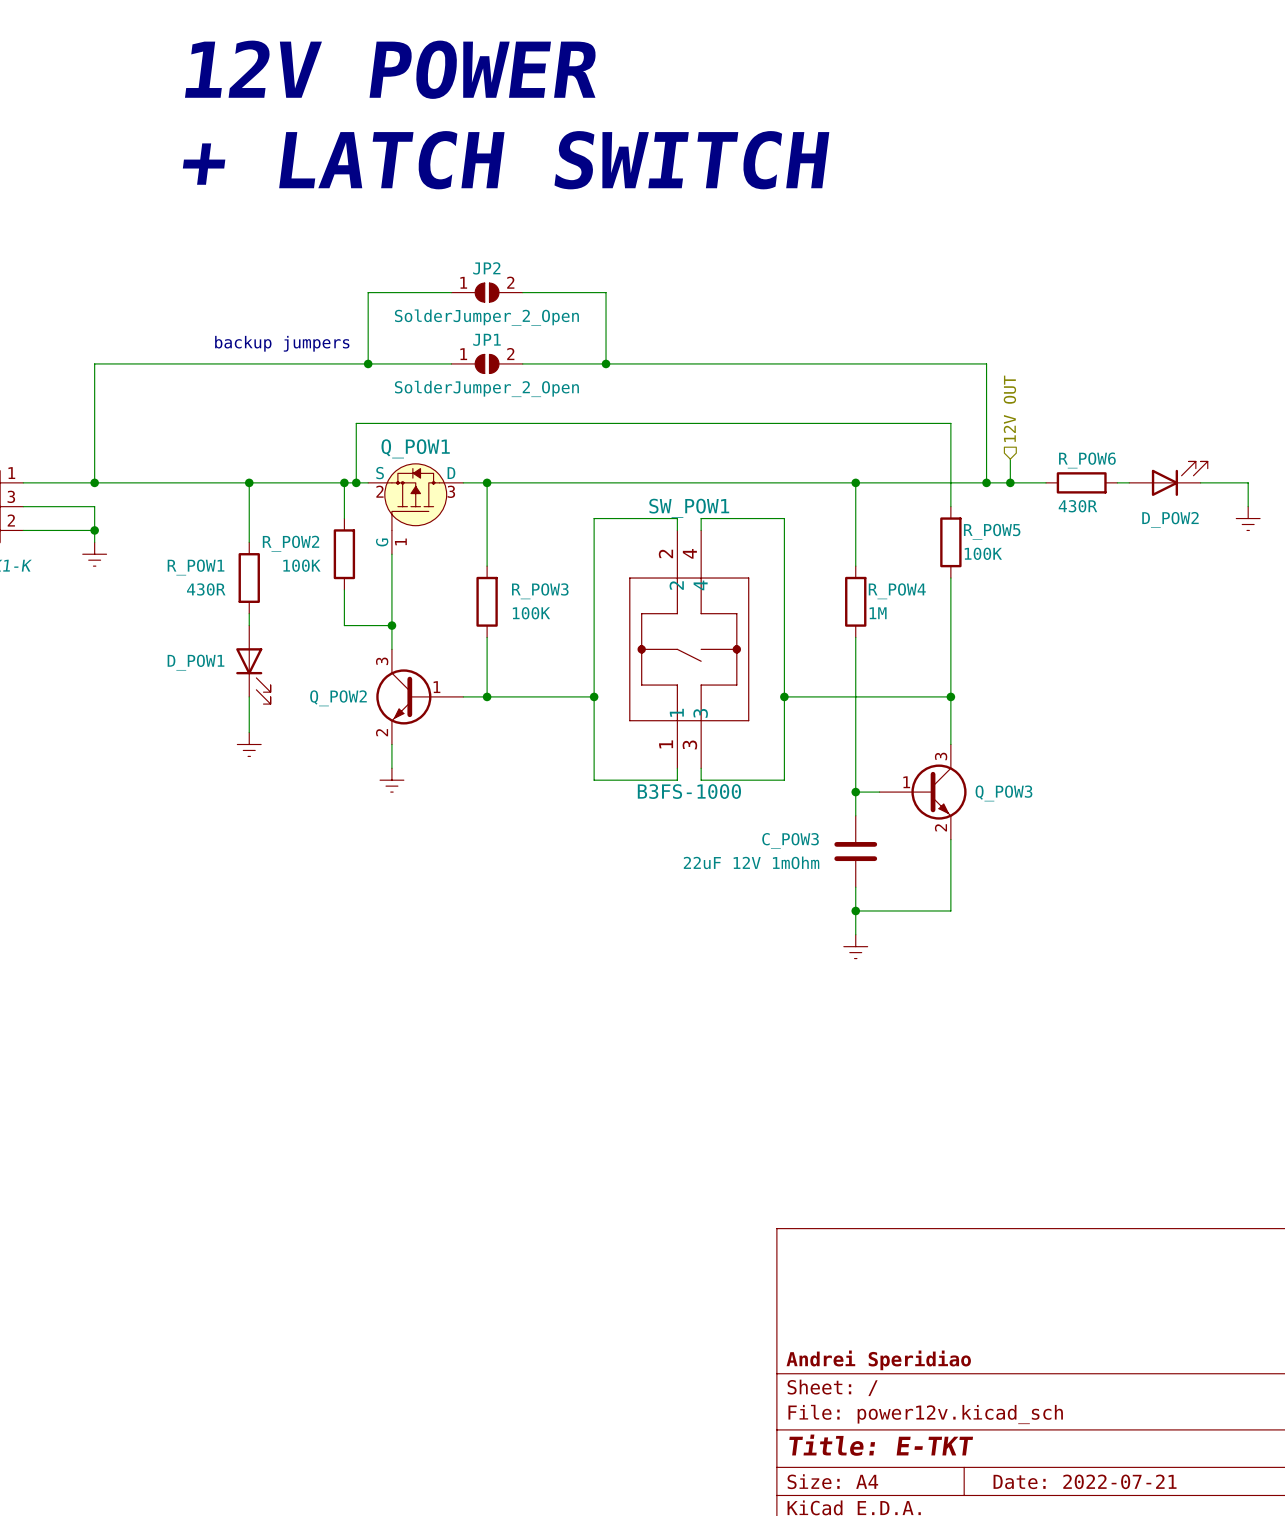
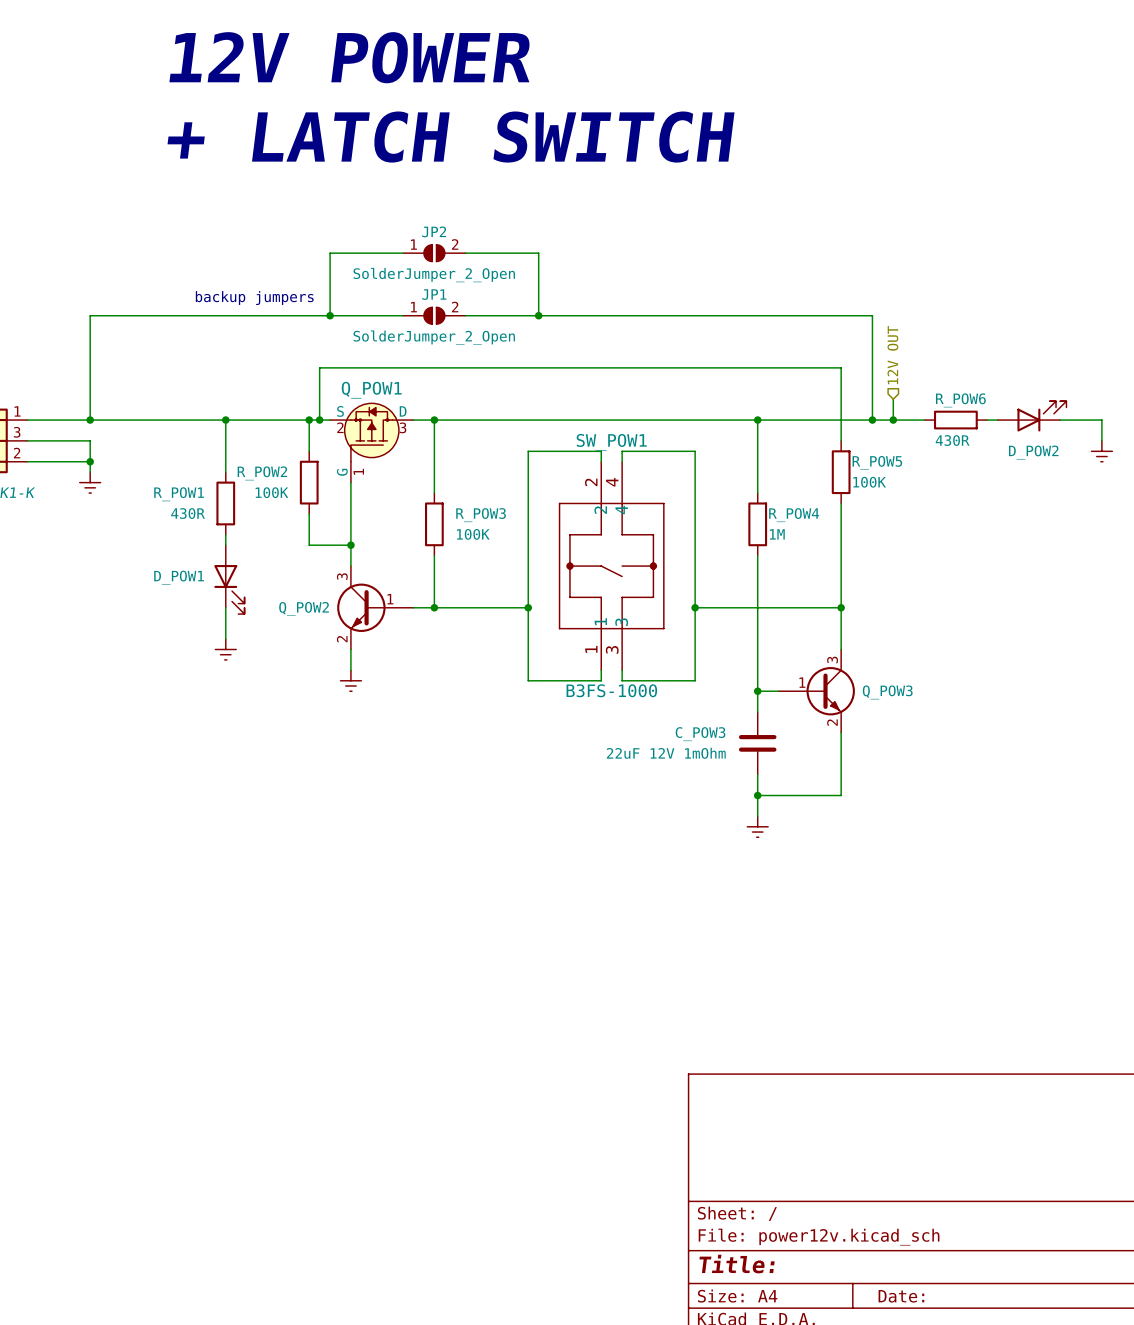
title block: Andrei Speridiao (878, 1360) -> none
title block: Title: E-TKT (881, 1445) -> Title: (737, 1264)
title block: Date: 2022-07-21 (1085, 1481) -> Date: (901, 1296)

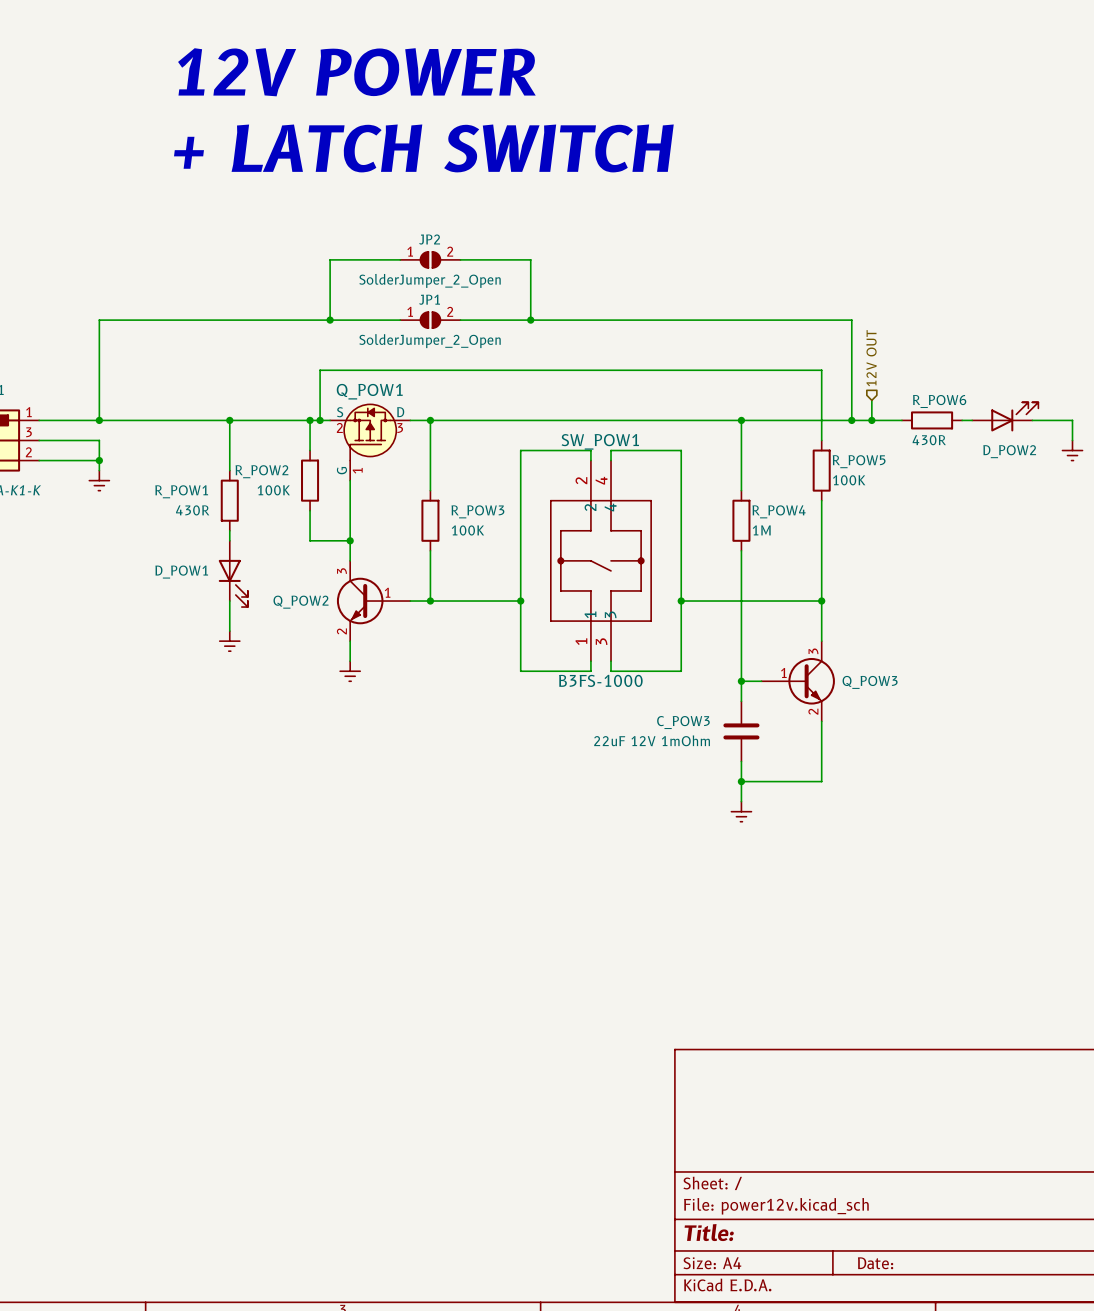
text: backup jumpers (254, 298) -> none

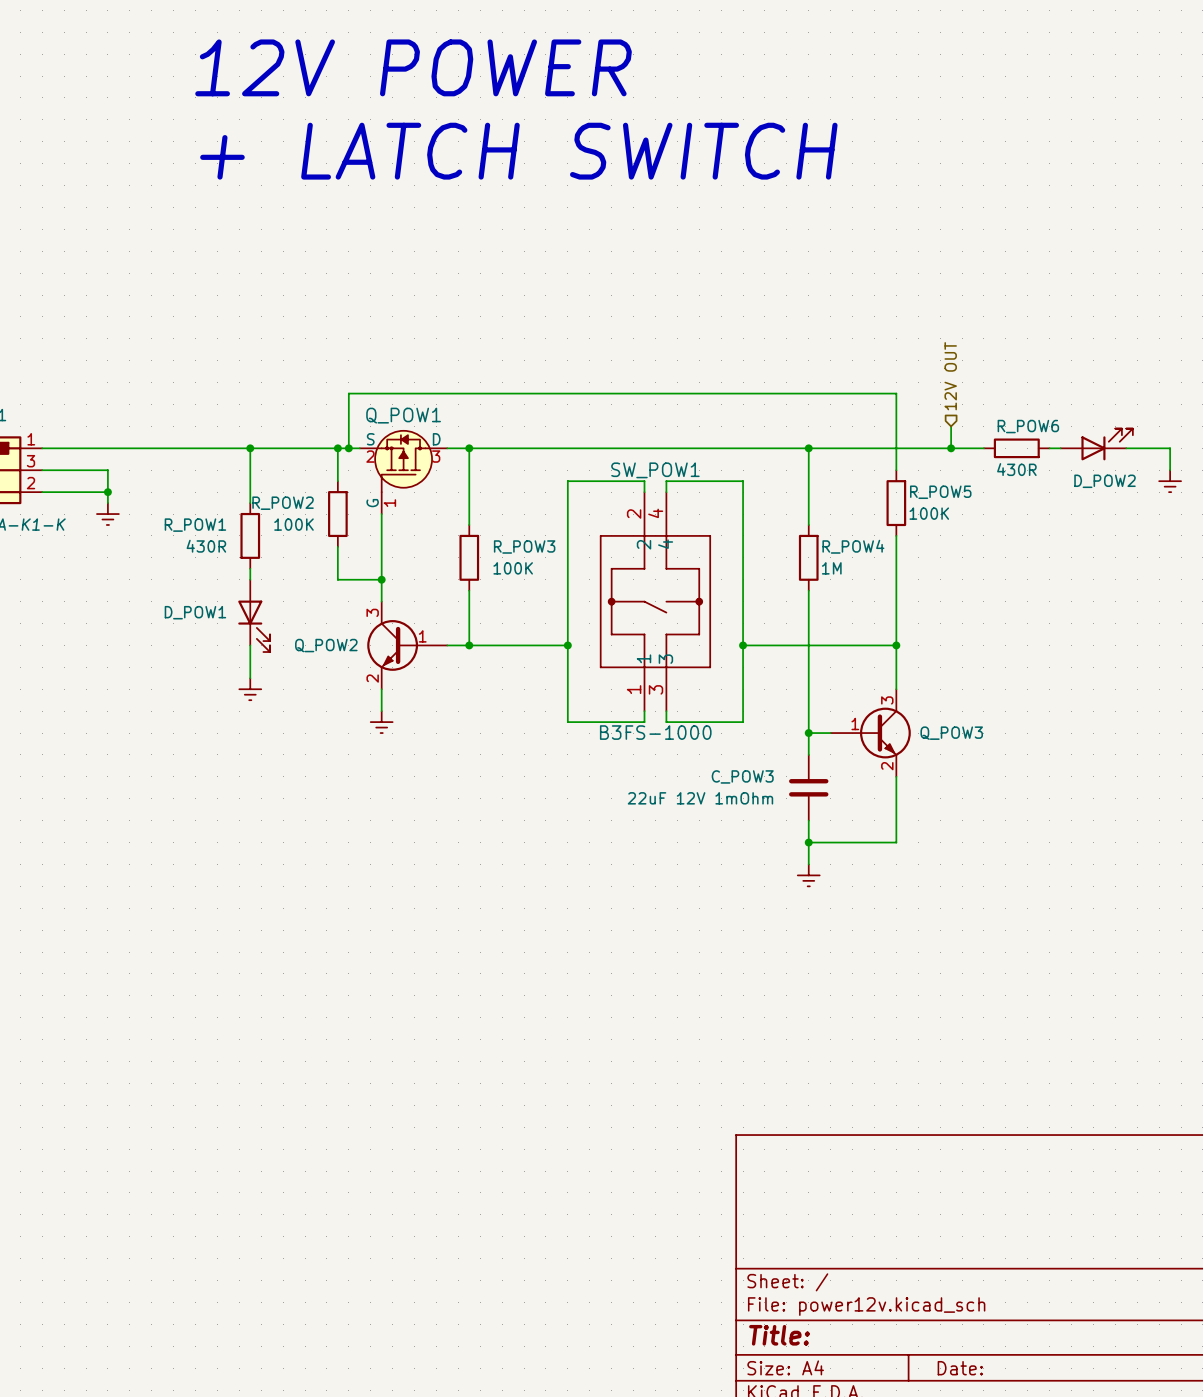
wire: (400, 259) (330, 259) (330, 320) -> none
JP2: SolderJumper_2_Open (430, 259) -> none
wire: (460, 259) (530, 259) (530, 320) -> none
junction: (330, 320) -> none
wire: (400, 320) (99, 320) (99, 420) -> none
JP1: SolderJumper_2_Open (430, 320) -> none
wire: (460, 320) (851, 320) (851, 420) -> none
junction: (530, 320) -> none
junction: (99, 420) -> none
junction: (851, 420) -> none

